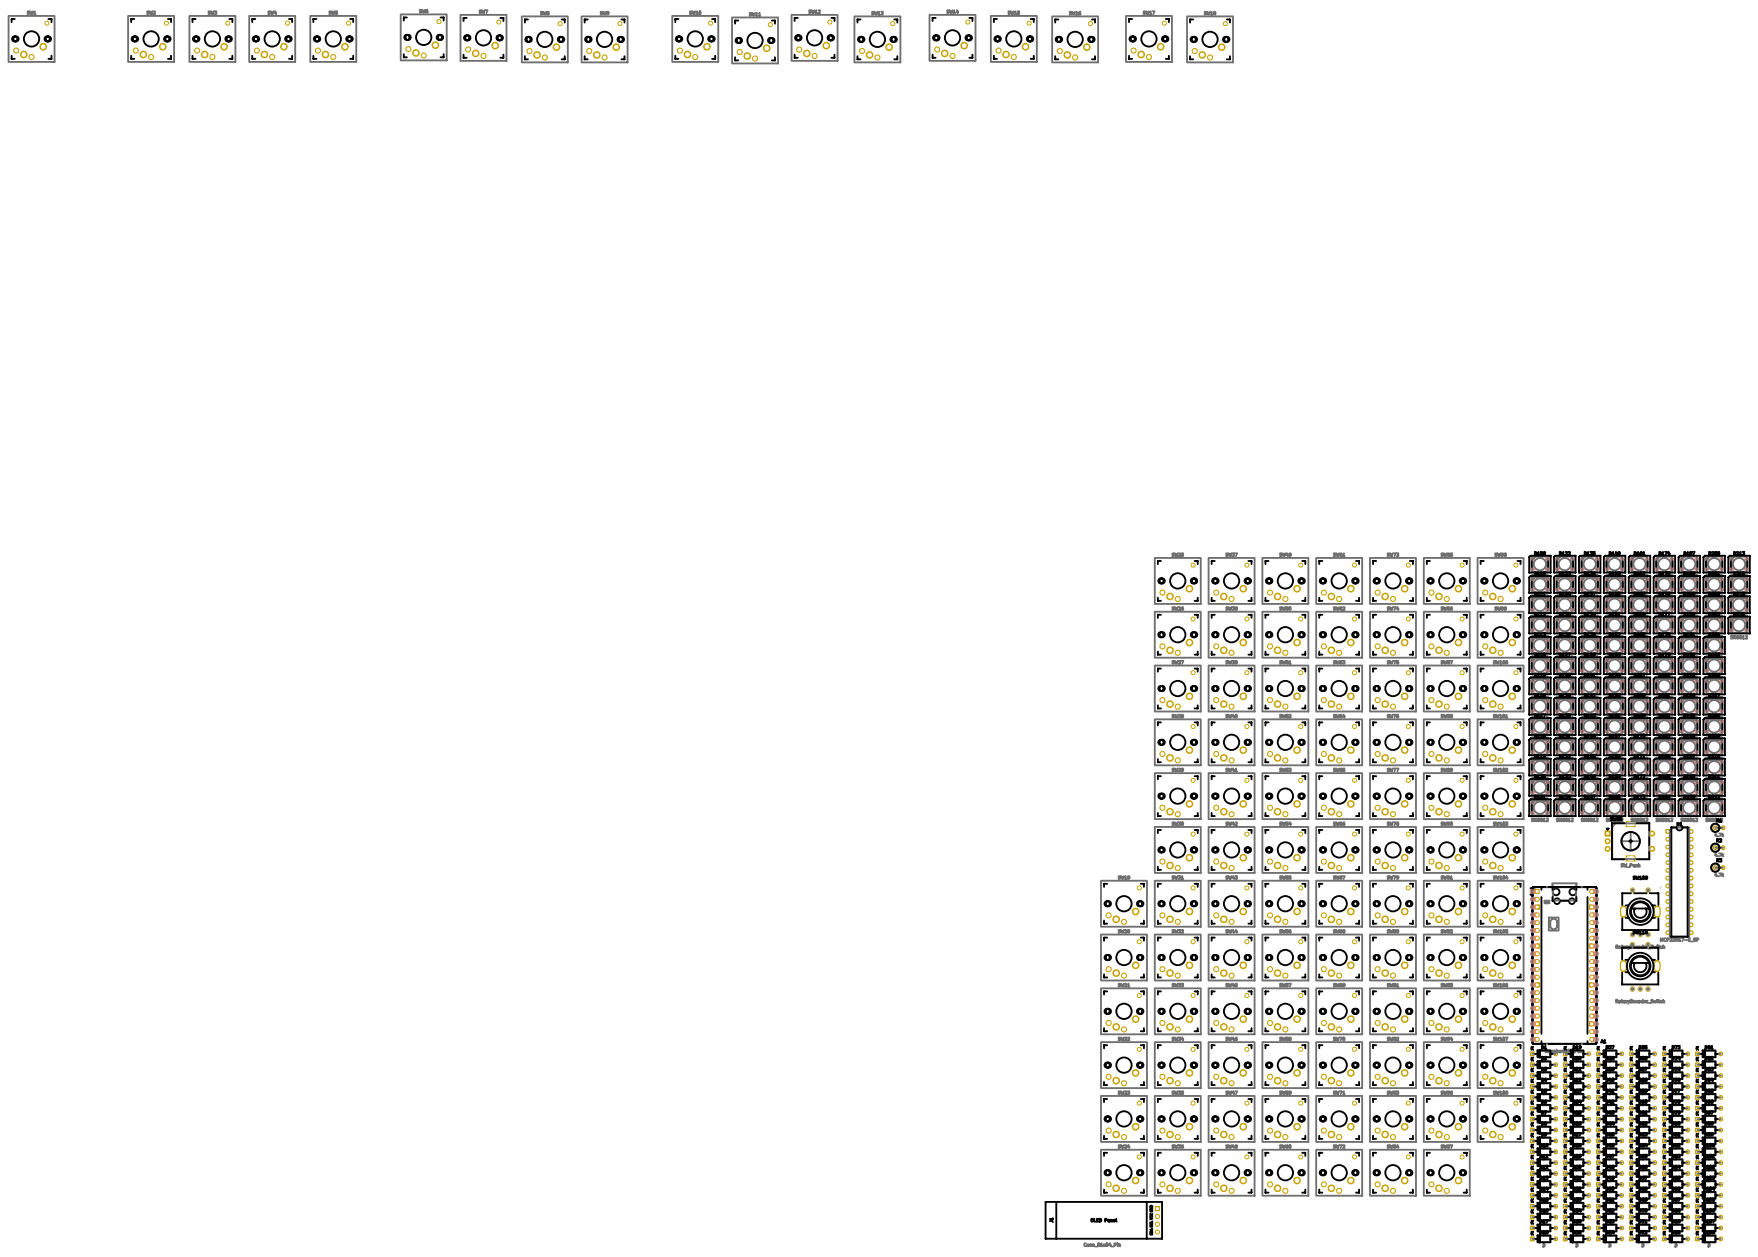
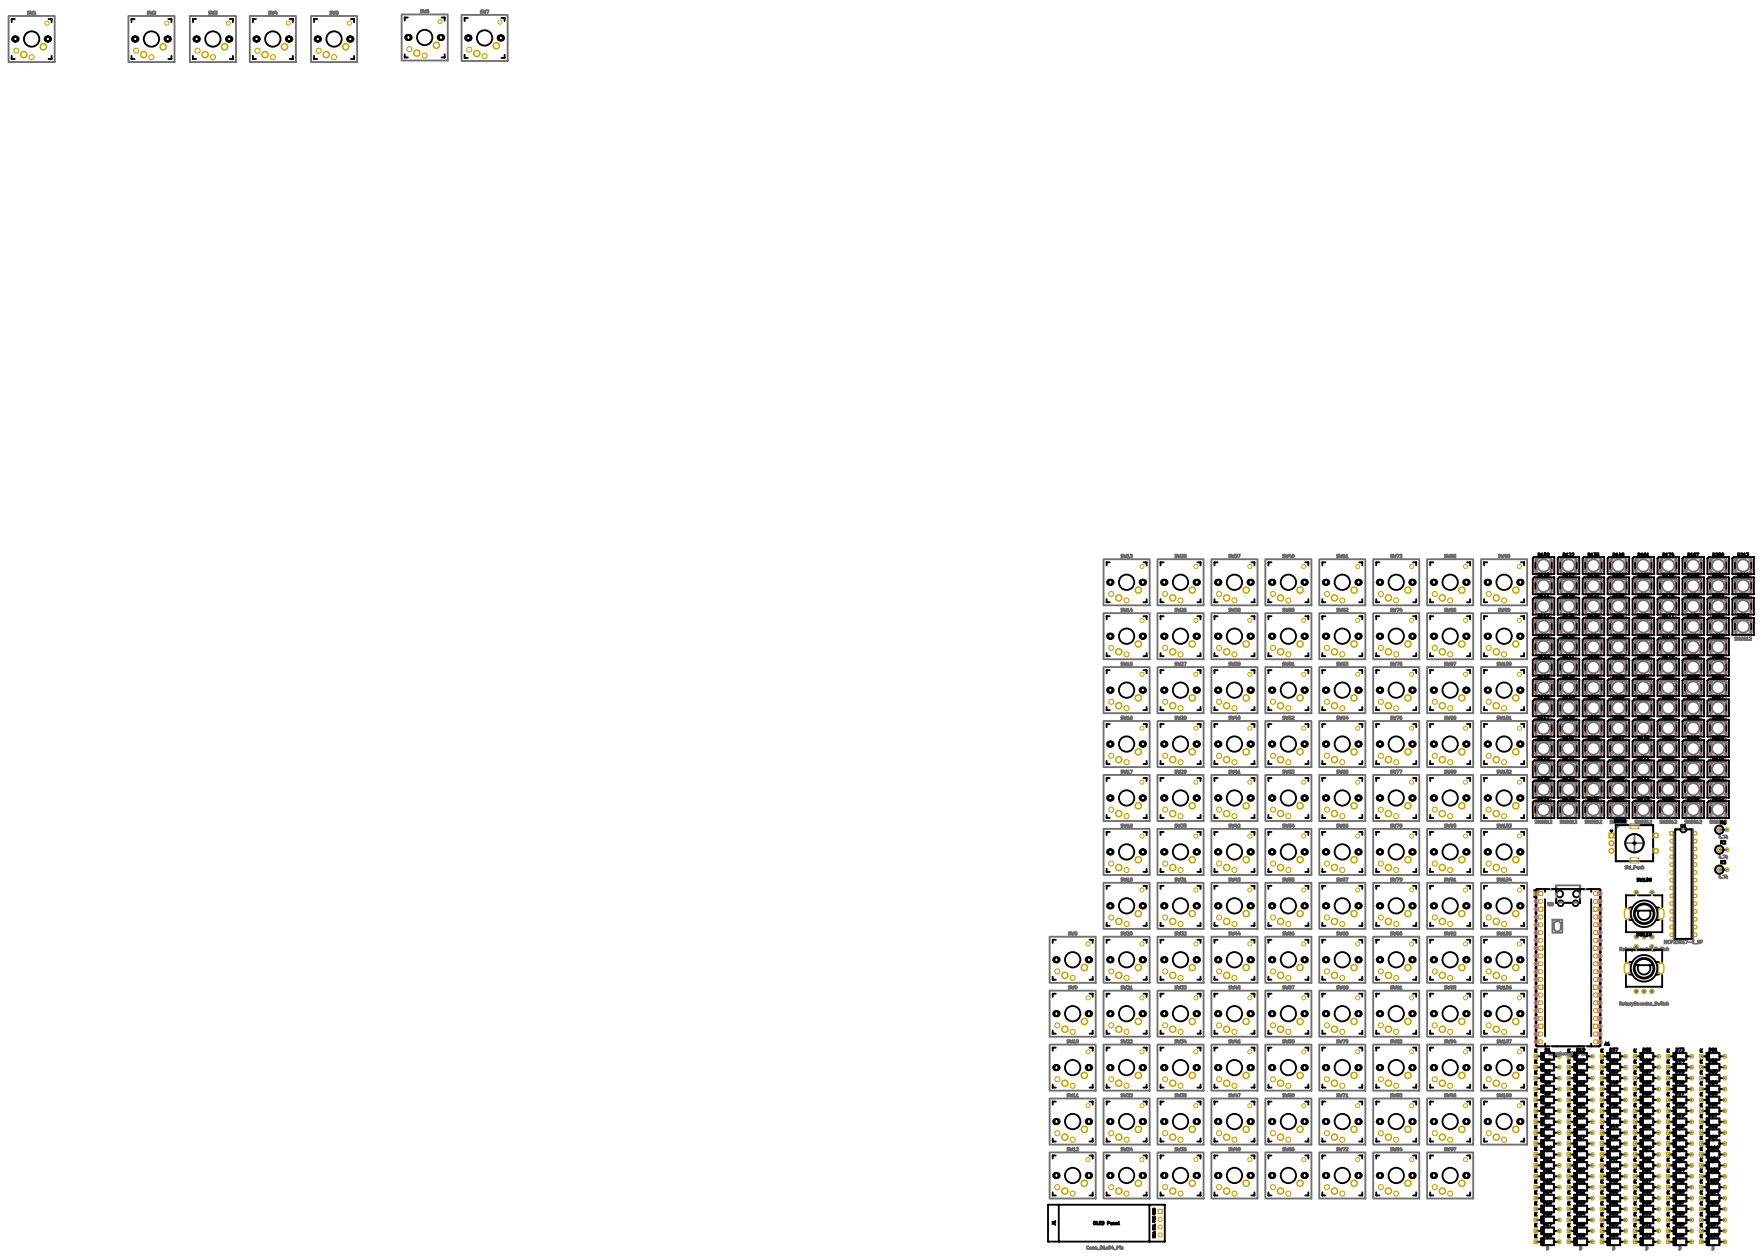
part position: (814, 37) -> (1072, 1175)
part position: (952, 37) -> (1126, 636)
part position: (695, 38) -> (1072, 1067)
part position: (1013, 38) -> (1126, 690)
part position: (1148, 38) -> (1126, 797)
part position: (544, 39) -> (1072, 959)
part position: (604, 39) -> (1072, 1013)
part position: (877, 39) -> (1126, 582)
part position: (1075, 39) -> (1126, 744)
part position: (1210, 39) -> (1126, 851)
part position: (755, 40) -> (1072, 1121)

